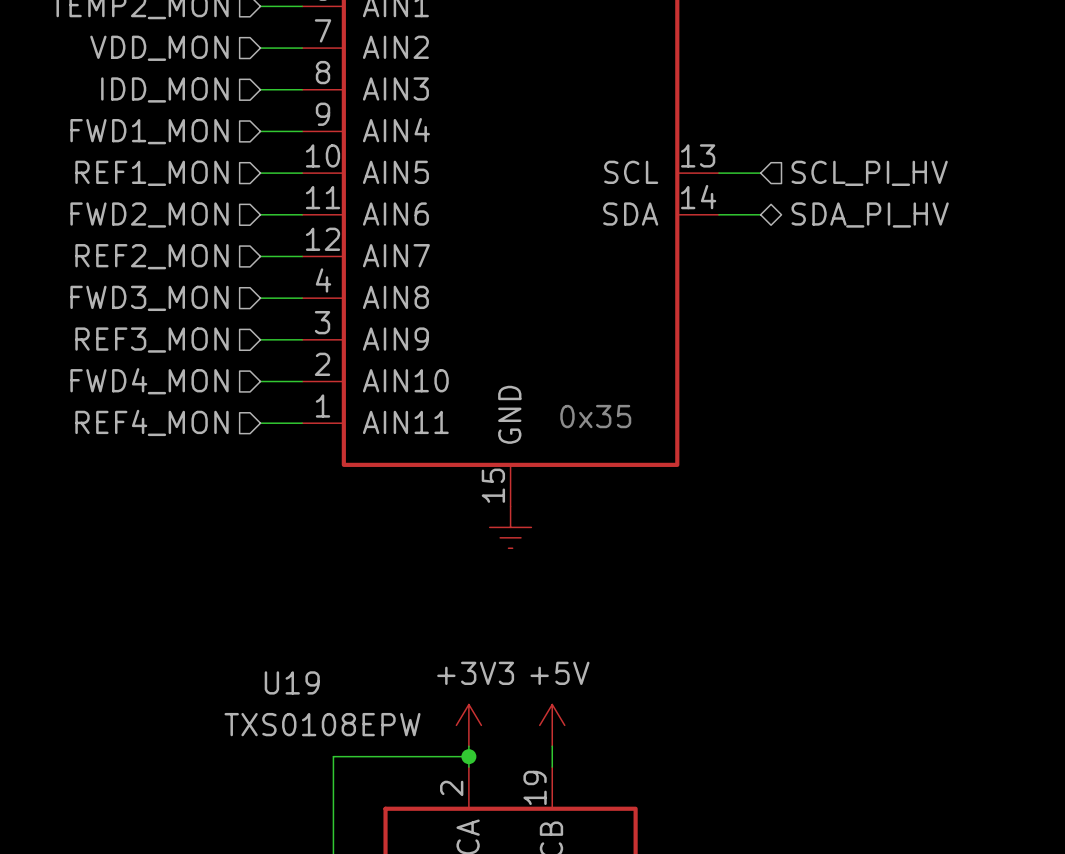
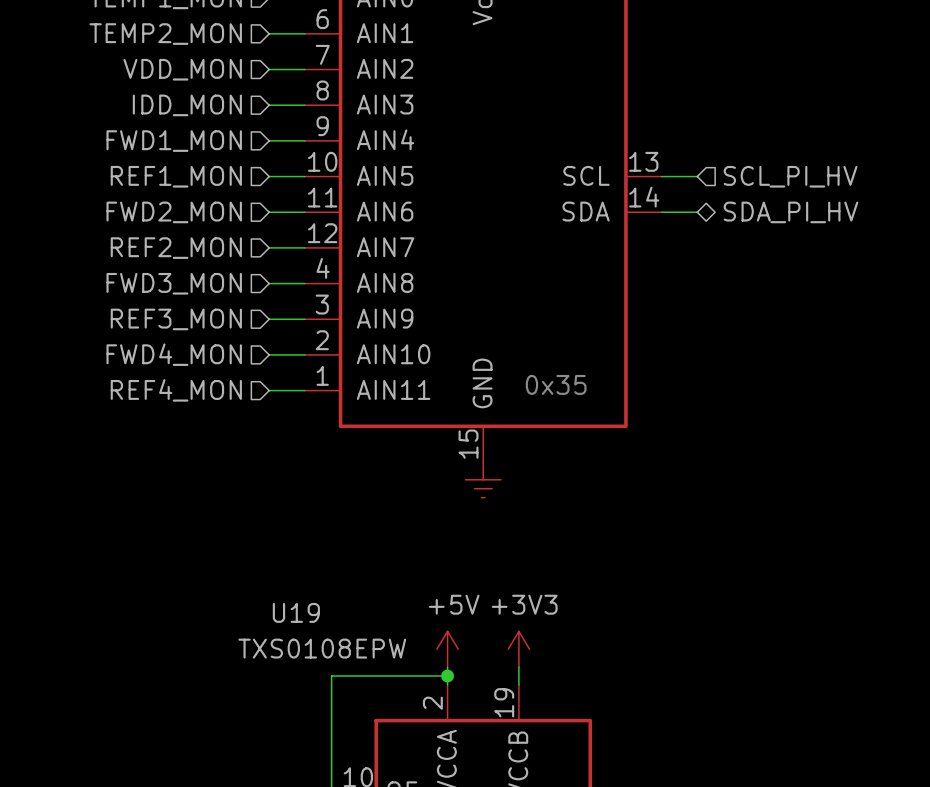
power symbol: +3V3 (468, 725) -> +5V (447, 649)
power symbol: +5V (552, 725) -> +3V3 (518, 649)

